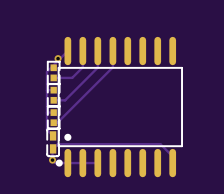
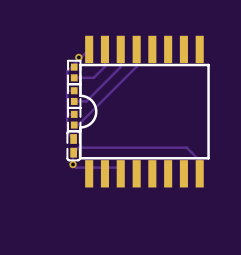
part footprint: [55, 36, 183, 178] -> [79, 35, 210, 188]

